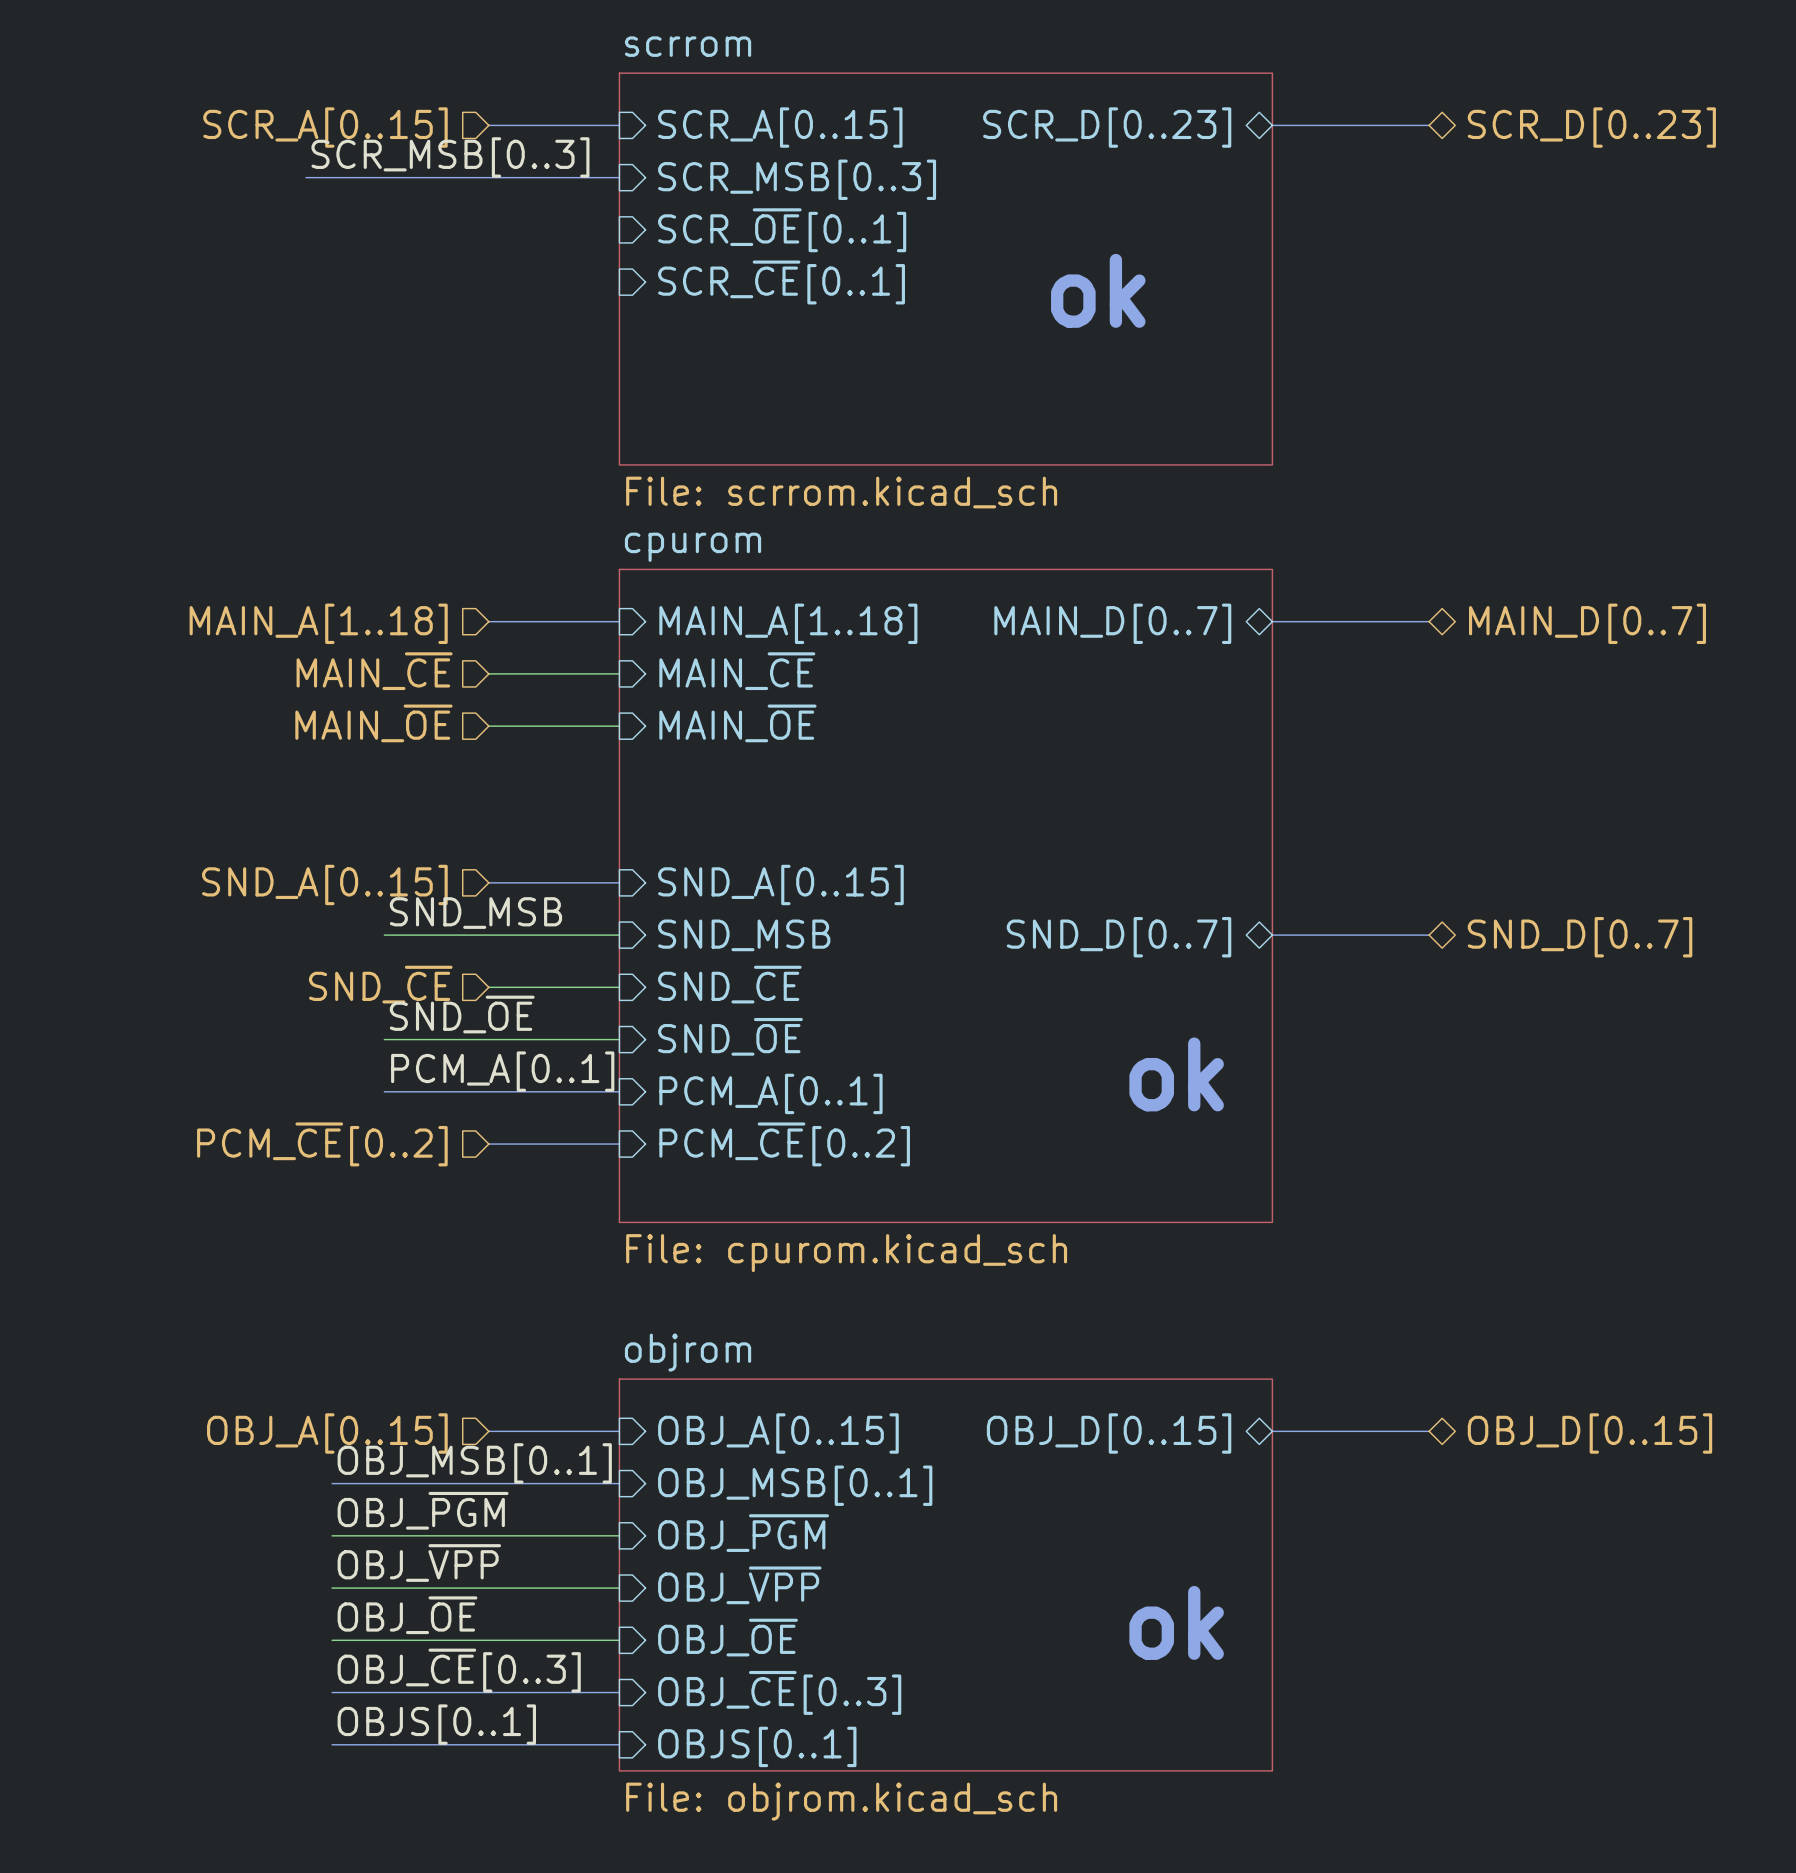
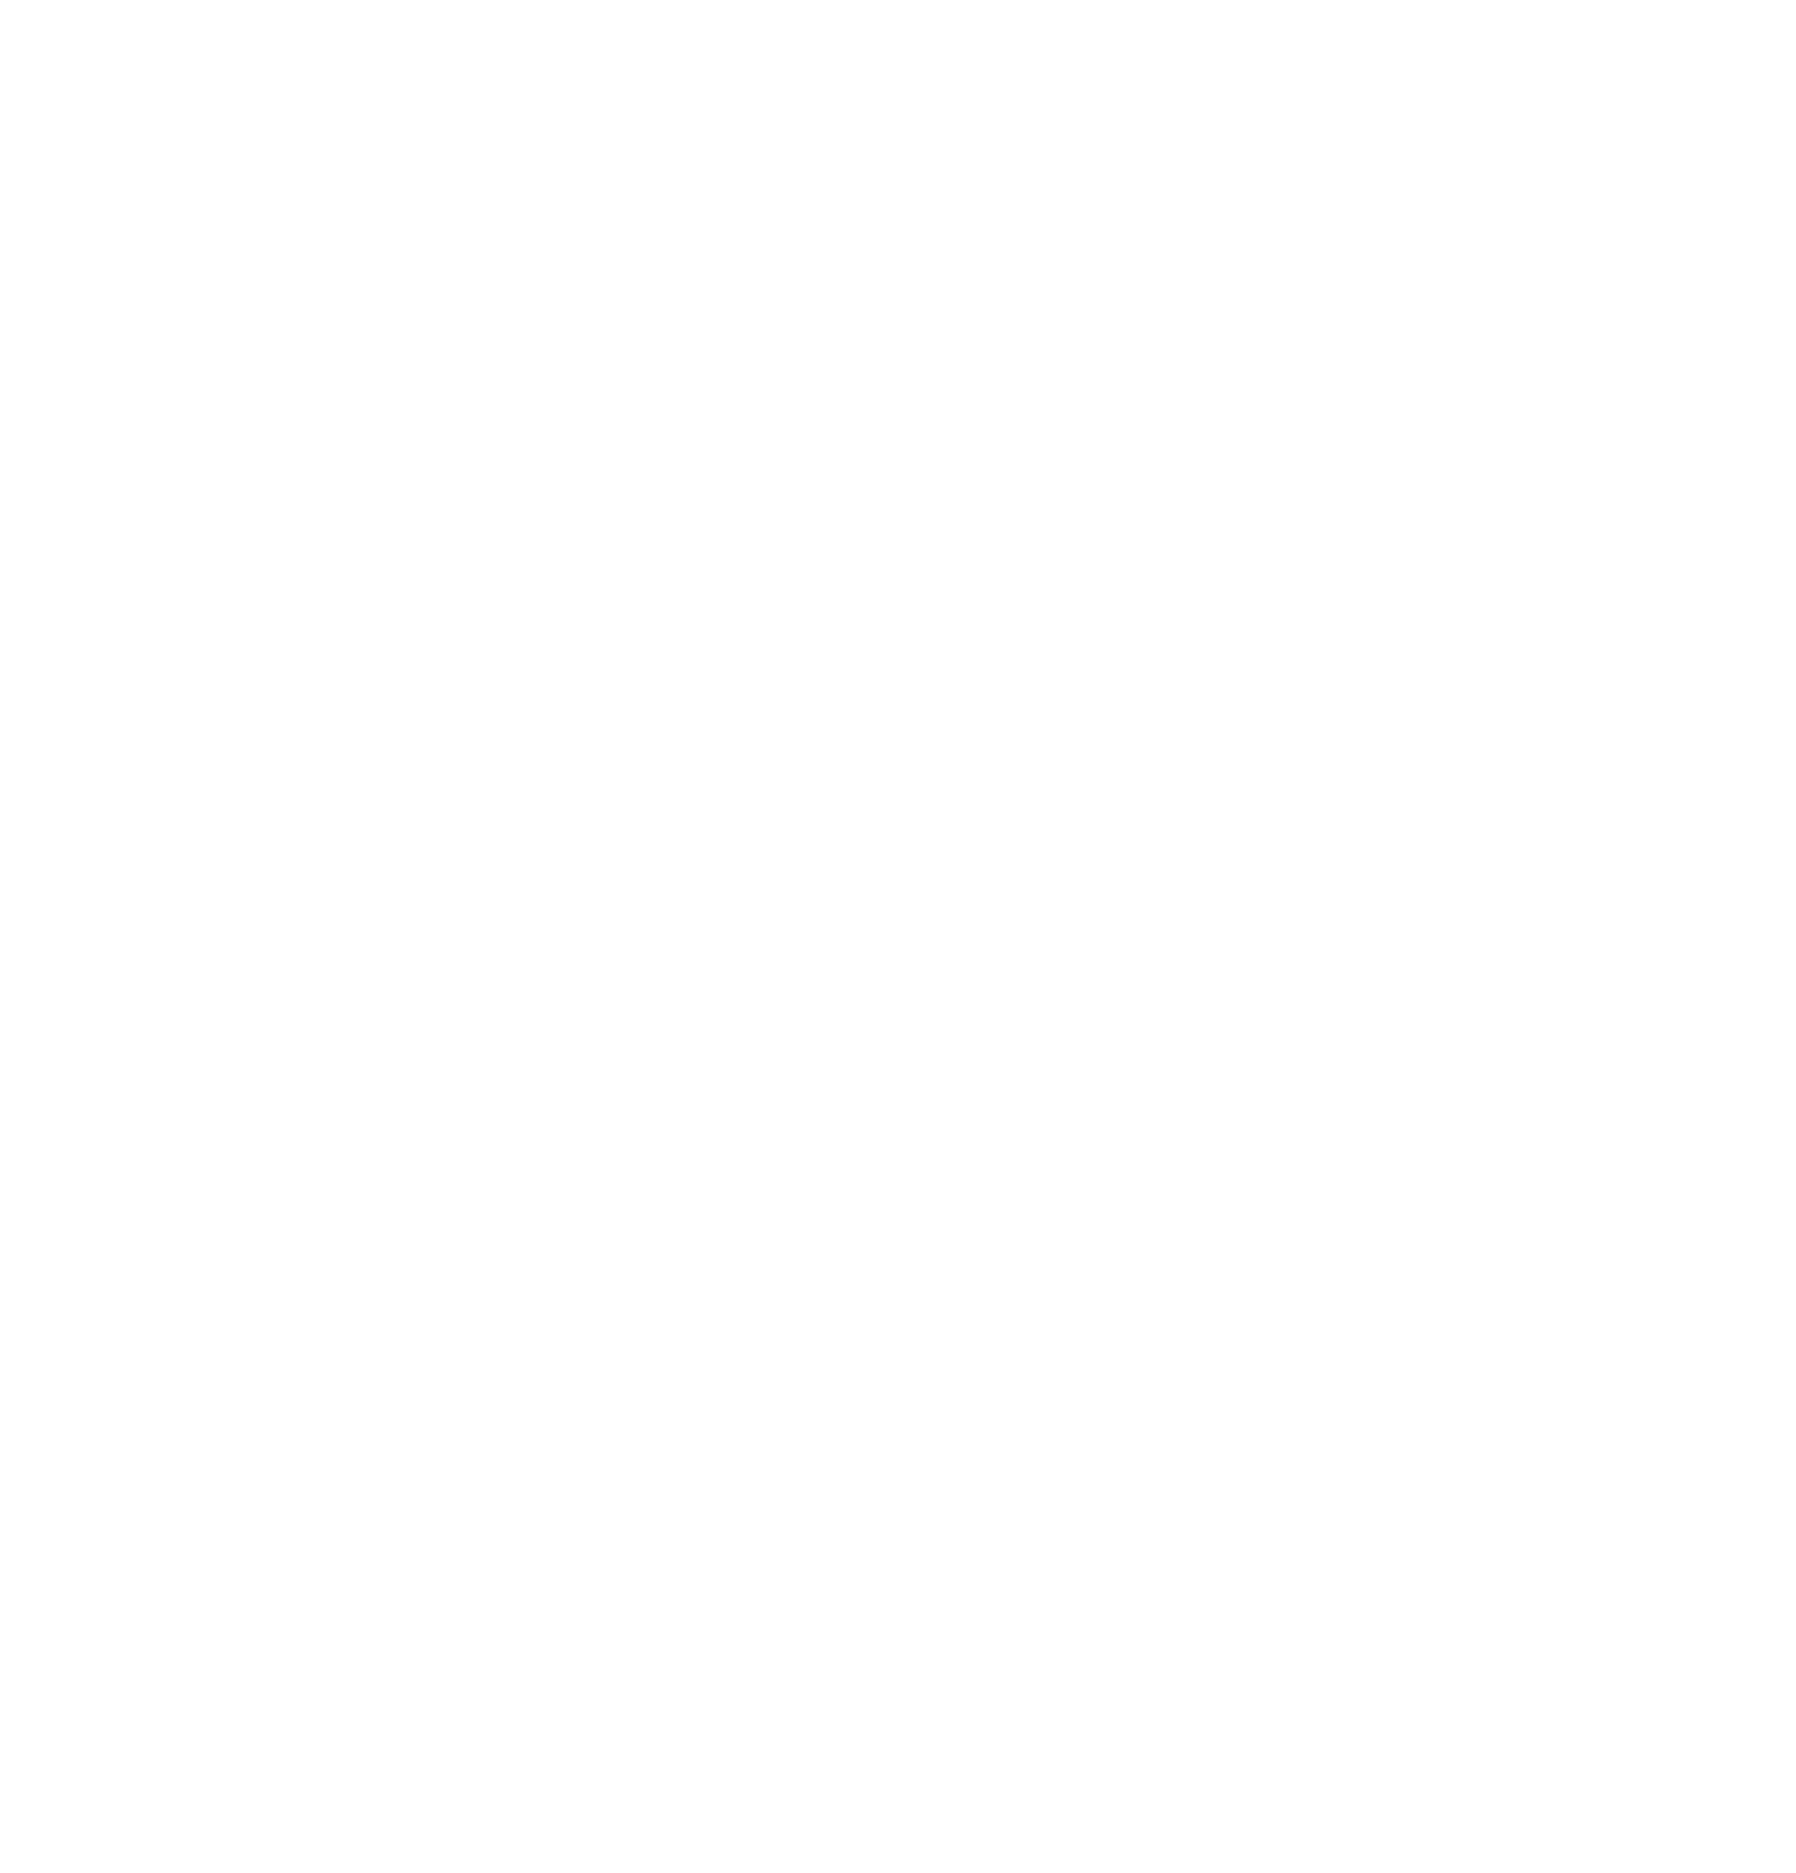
bus: (488, 125) (619, 125) -> none
bus: (1272, 125) (1429, 125) -> none
hierarchical label: SCR_A[0..15] (325, 127) -> none
sheet pin: SCR_A[0..15] (780, 127) -> none
sheet pin: SCR_D[0..23] (1107, 127) -> none
hierarchical label: SCR_D[0..23] (1591, 127) -> none
label: SCR_MSB[0..3] (450, 157) -> none
bus: (306, 177) (619, 177) -> none
sheet pin: SCR_MSB[0..3] (797, 179) -> none
sheet pin: SCR_~{OE}[0..1] (782, 230) -> none
sheet scrrom: File: scrrom.kicad_sch (945, 269) -> none
sheet pin: SCR_~{CE}[0..1] (781, 282) -> none
text: ok (1098, 290) -> none
bus: (488, 621) (619, 621) -> none
bus: (1272, 621) (1429, 621) -> none
hierarchical label: MAIN_A[1..18] (318, 623) -> none
sheet pin: MAIN_A[1..18] (788, 623) -> none
sheet pin: MAIN_D[0..7] (1112, 623) -> none
hierarchical label: MAIN_D[0..7] (1587, 623) -> none
hierarchical label: MAIN_~{CE} (374, 671) -> none
sheet pin: MAIN_~{CE} (737, 671) -> none
wire: (488, 673) (619, 673) -> none
hierarchical label: MAIN_~{OE} (373, 723) -> none
sheet pin: MAIN_~{OE} (737, 723) -> none
wire: (488, 726) (619, 726) -> none
bus: (488, 882) (619, 882) -> none
hierarchical label: SND_A[0..15] (324, 884) -> none
sheet pin: SND_A[0..15] (780, 884) -> none
sheet cpurom: File: cpurom.kicad_sch (945, 895) -> none
label: SND_MSB (475, 913) -> none
wire: (384, 935) (619, 935) -> none
sheet pin: SND_MSB (744, 935) -> none
bus: (1272, 935) (1429, 935) -> none
sheet pin: SND_D[0..7] (1119, 937) -> none
hierarchical label: SND_D[0..7] (1580, 937) -> none
hierarchical label: SND_~{CE} (380, 984) -> none
sheet pin: SND_~{CE} (729, 984) -> none
wire: (488, 987) (619, 987) -> none
label: SND_~{OE} (462, 1014) -> none
sheet pin: SND_~{OE} (730, 1036) -> none
wire: (384, 1039) (619, 1039) -> none
label: PCM_A[0..1] (502, 1071) -> none
text: ok (1176, 1074) -> none
bus: (384, 1091) (619, 1091) -> none
sheet pin: PCM_A[0..1] (770, 1093) -> none
hierarchical label: PCM_~{CE}[0..2] (322, 1144) -> none
bus: (488, 1144) (619, 1144) -> none
sheet pin: PCM_~{CE}[0..2] (784, 1144) -> none
bus: (488, 1431) (619, 1431) -> none
bus: (1272, 1431) (1429, 1431) -> none
hierarchical label: OBJ_A[0..15] (327, 1433) -> none
sheet pin: OBJ_A[0..15] (778, 1433) -> none
sheet pin: OBJ_D[0..15] (1109, 1433) -> none
hierarchical label: OBJ_D[0..15] (1589, 1433) -> none
label: OBJ_MSB[0..1] (474, 1463) -> none
bus: (332, 1483) (619, 1483) -> none
sheet pin: OBJ_MSB[0..1] (795, 1485) -> none
label: OBJ_~{PGM} (423, 1510) -> none
sheet pin: OBJ_~{PGM} (743, 1533) -> none
wire: (332, 1535) (619, 1535) -> none
label: OBJ_~{VPP} (419, 1563) -> none
sheet objrom: File: objrom.kicad_sch (945, 1575) -> none
sheet pin: OBJ_~{VPP} (739, 1585) -> none
wire: (332, 1588) (619, 1588) -> none
label: OBJ_~{OE} (407, 1615) -> none
text: ok (1176, 1622) -> none
sheet pin: OBJ_~{OE} (727, 1637) -> none
wire: (332, 1640) (619, 1640) -> none
label: OBJ_~{CE}[0..3] (459, 1670) -> none
bus: (332, 1692) (619, 1692) -> none
sheet pin: OBJ_~{CE}[0..3] (779, 1692) -> none
label: OBJS[0..1] (436, 1724) -> none
bus: (332, 1744) (619, 1744) -> none
sheet pin: OBJS[0..1] (757, 1746) -> none

